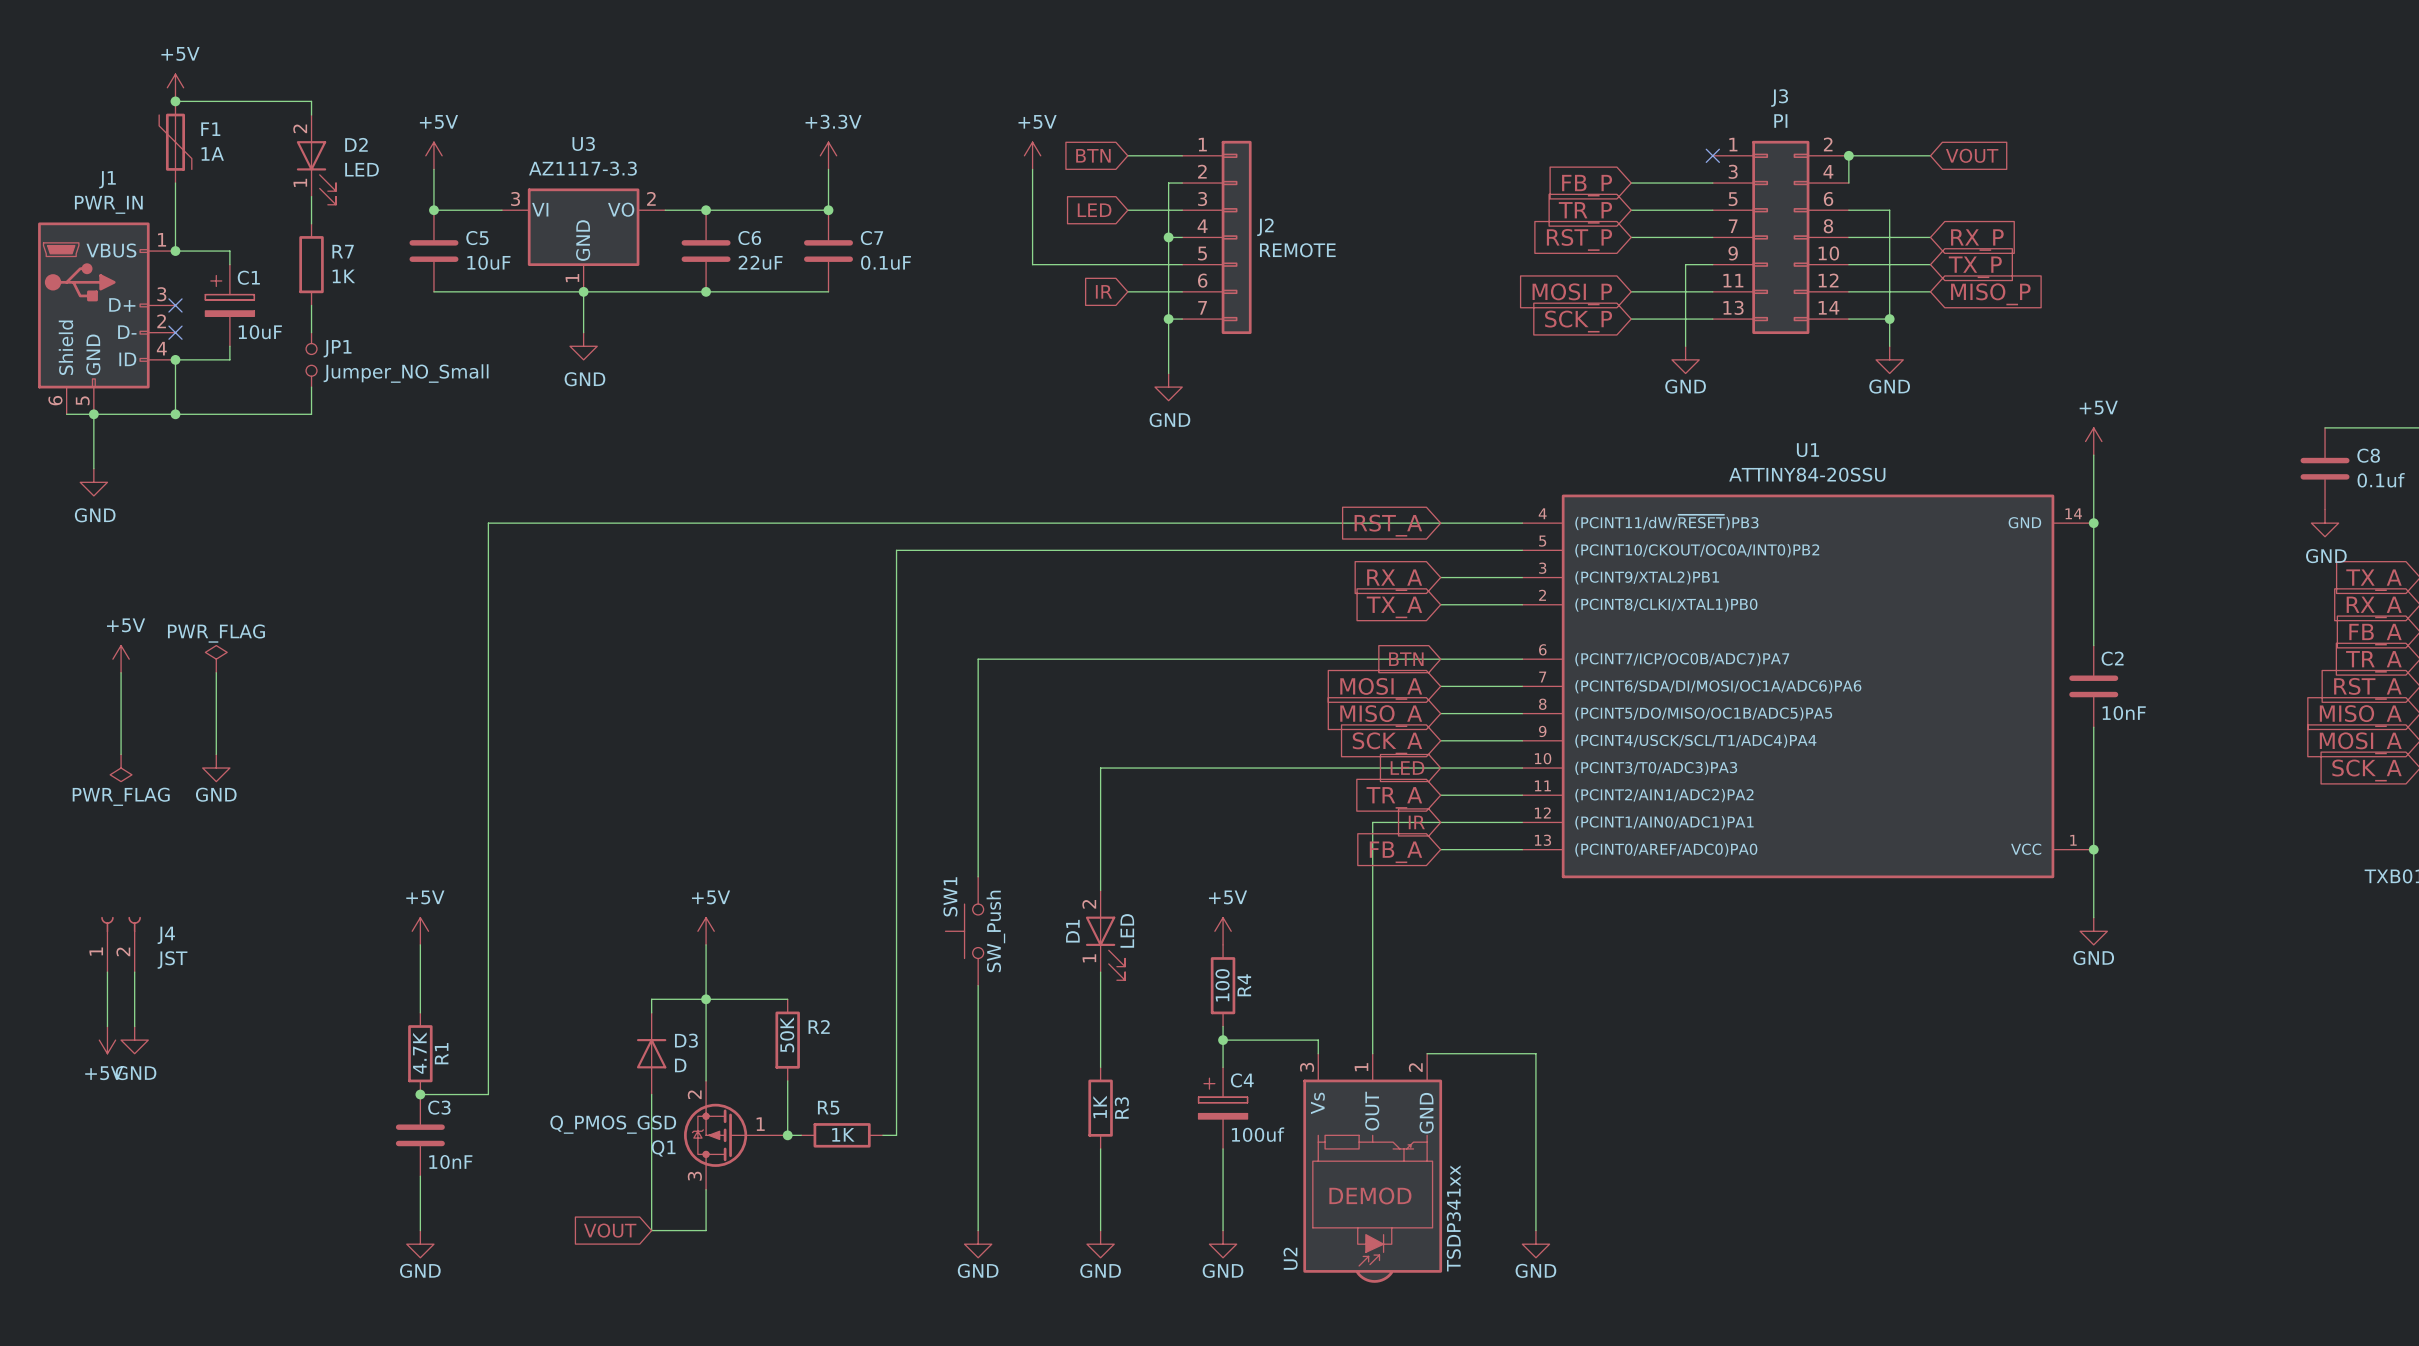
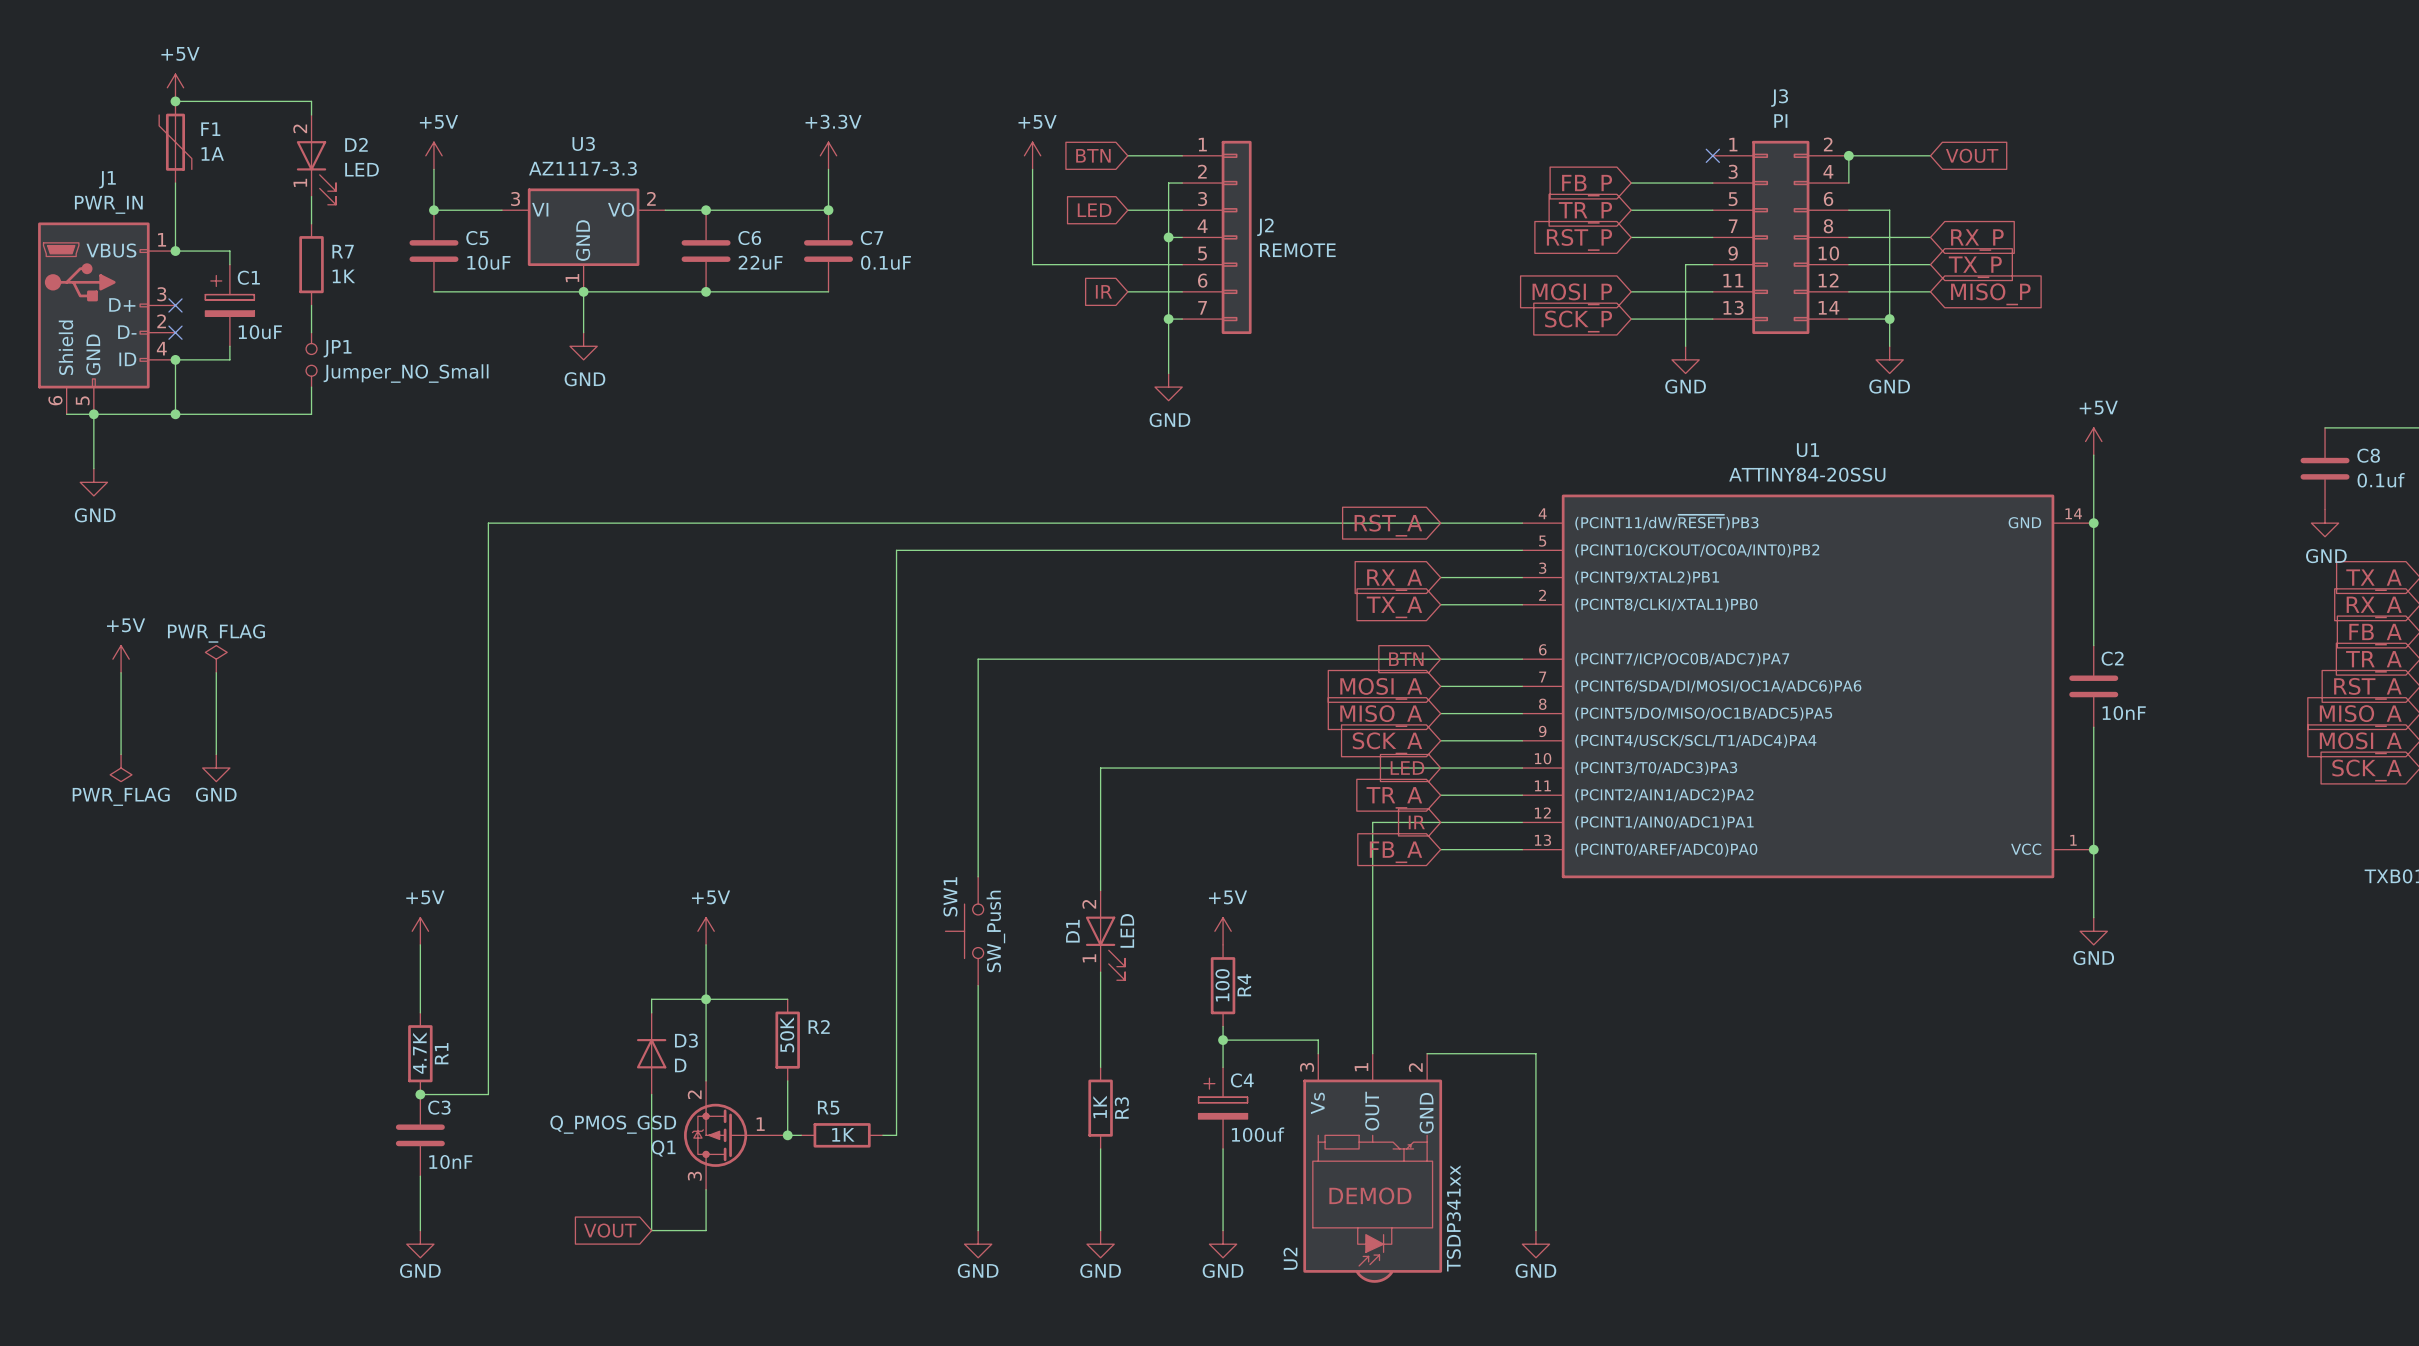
J4: JST (121, 944) -> none
wire: (107, 972) (107, 1026) -> none
wire: (134, 972) (134, 1026) -> none
power symbol: +5V (107, 1040) -> none
power symbol: GND (134, 1040) -> none

